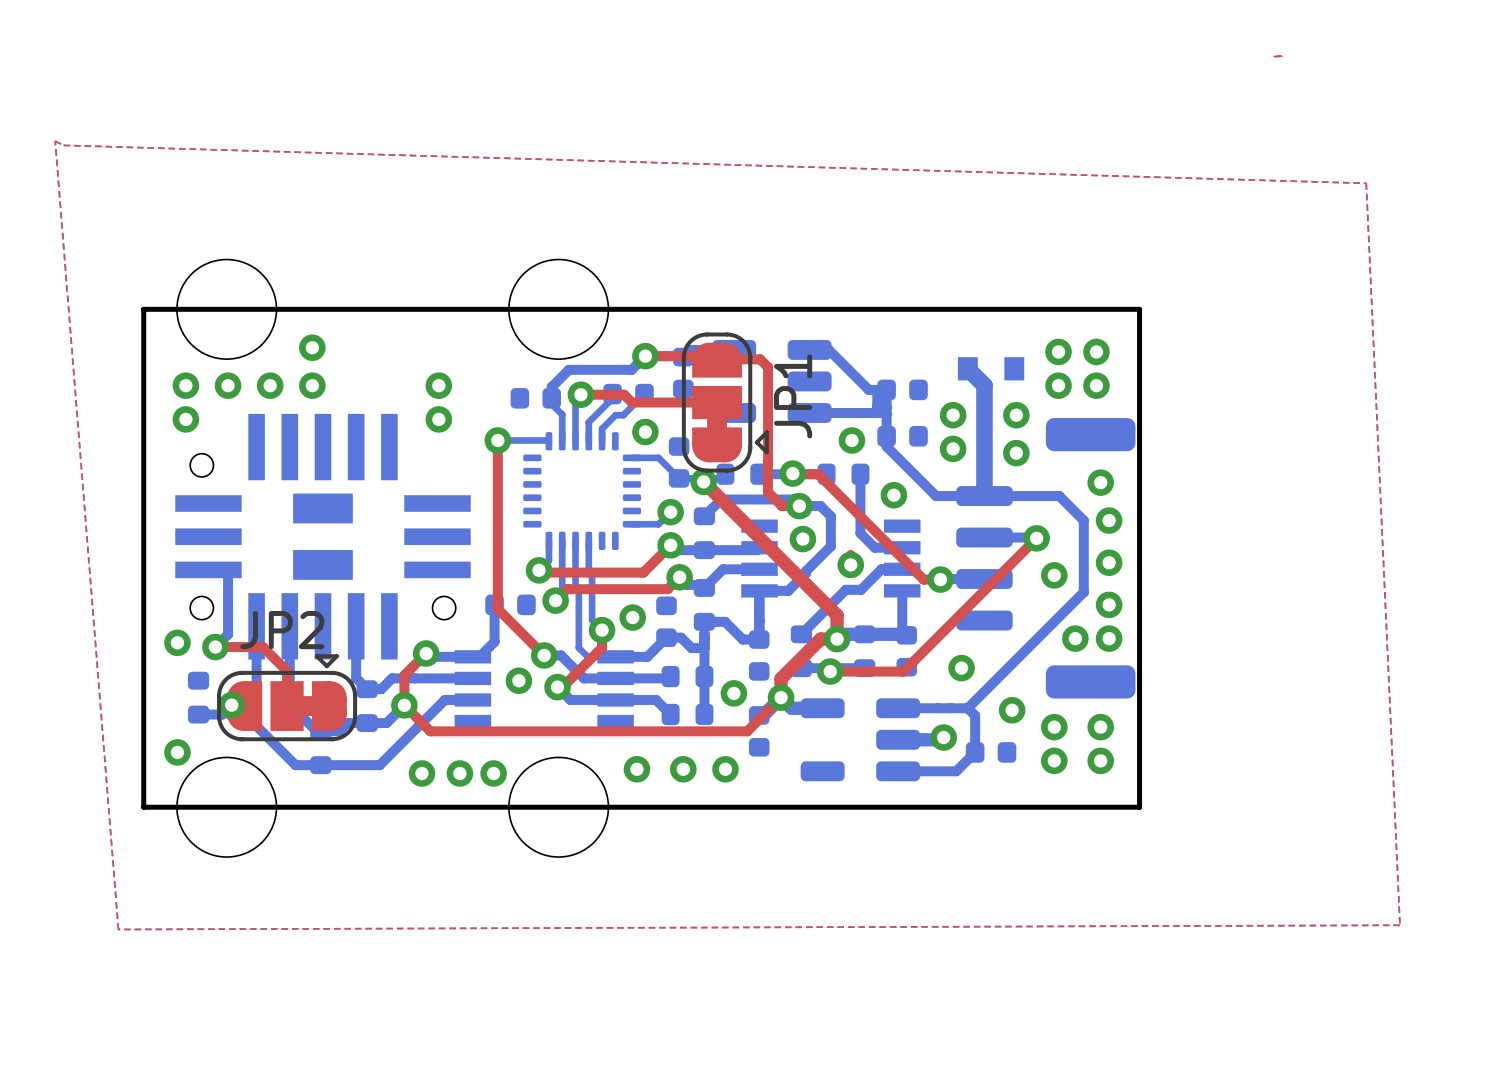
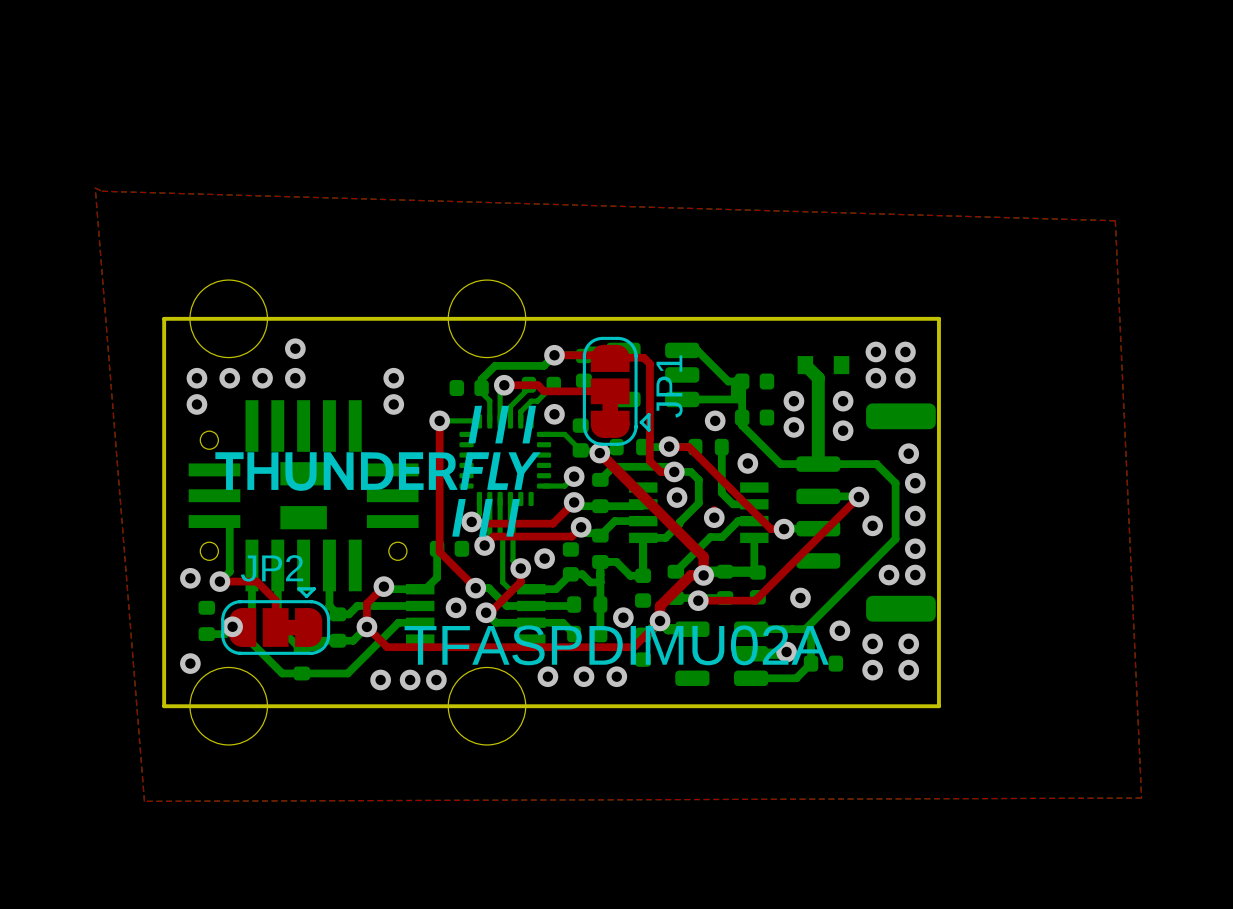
top zone outline: (1281, 55) (1281, 56) (1273, 56) (1281, 55) -> none
drawing: none -> [215, 405, 541, 537]
text: none -> TFASPDIMU02A (616, 645)

